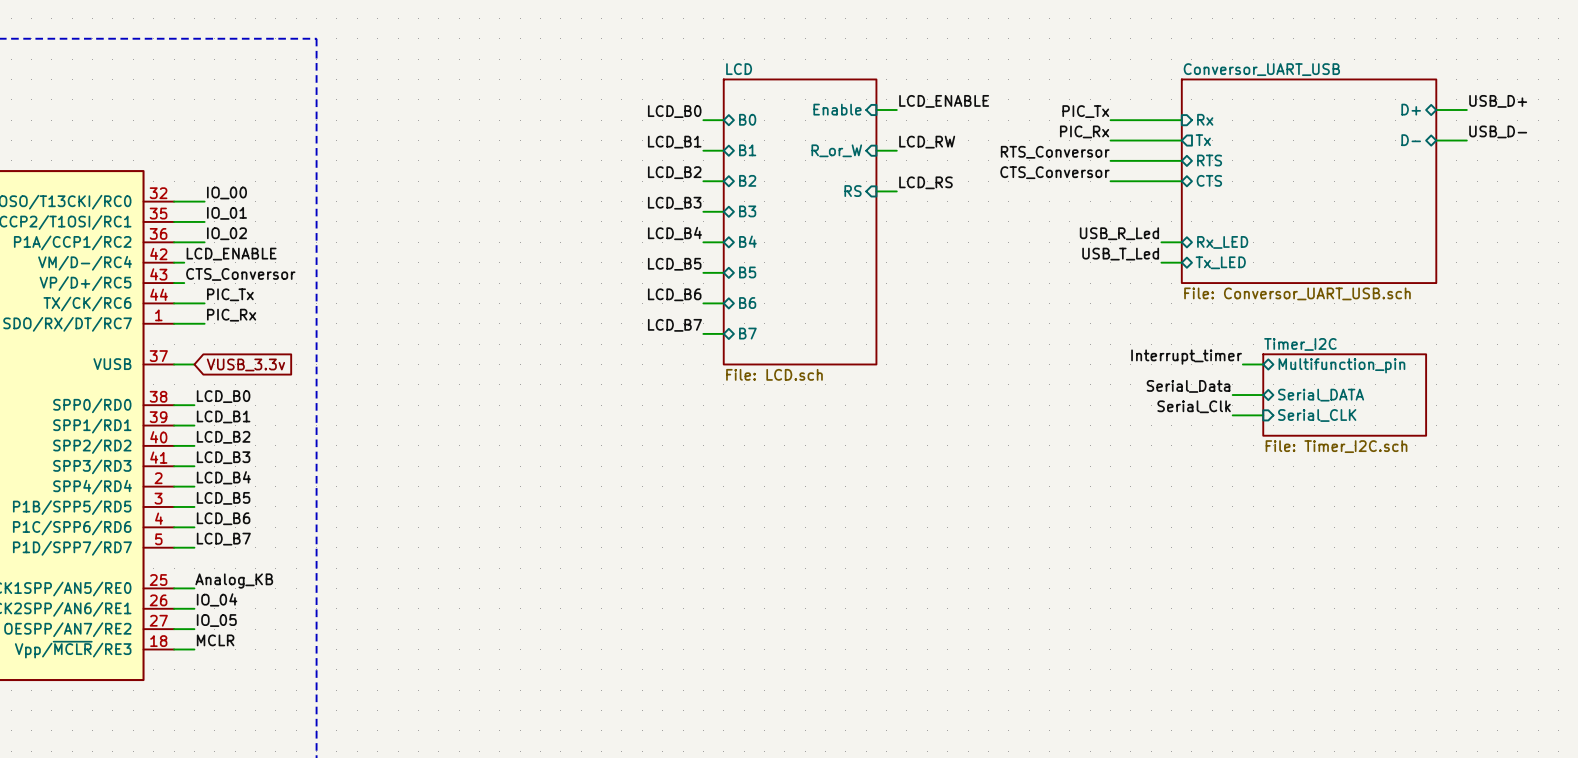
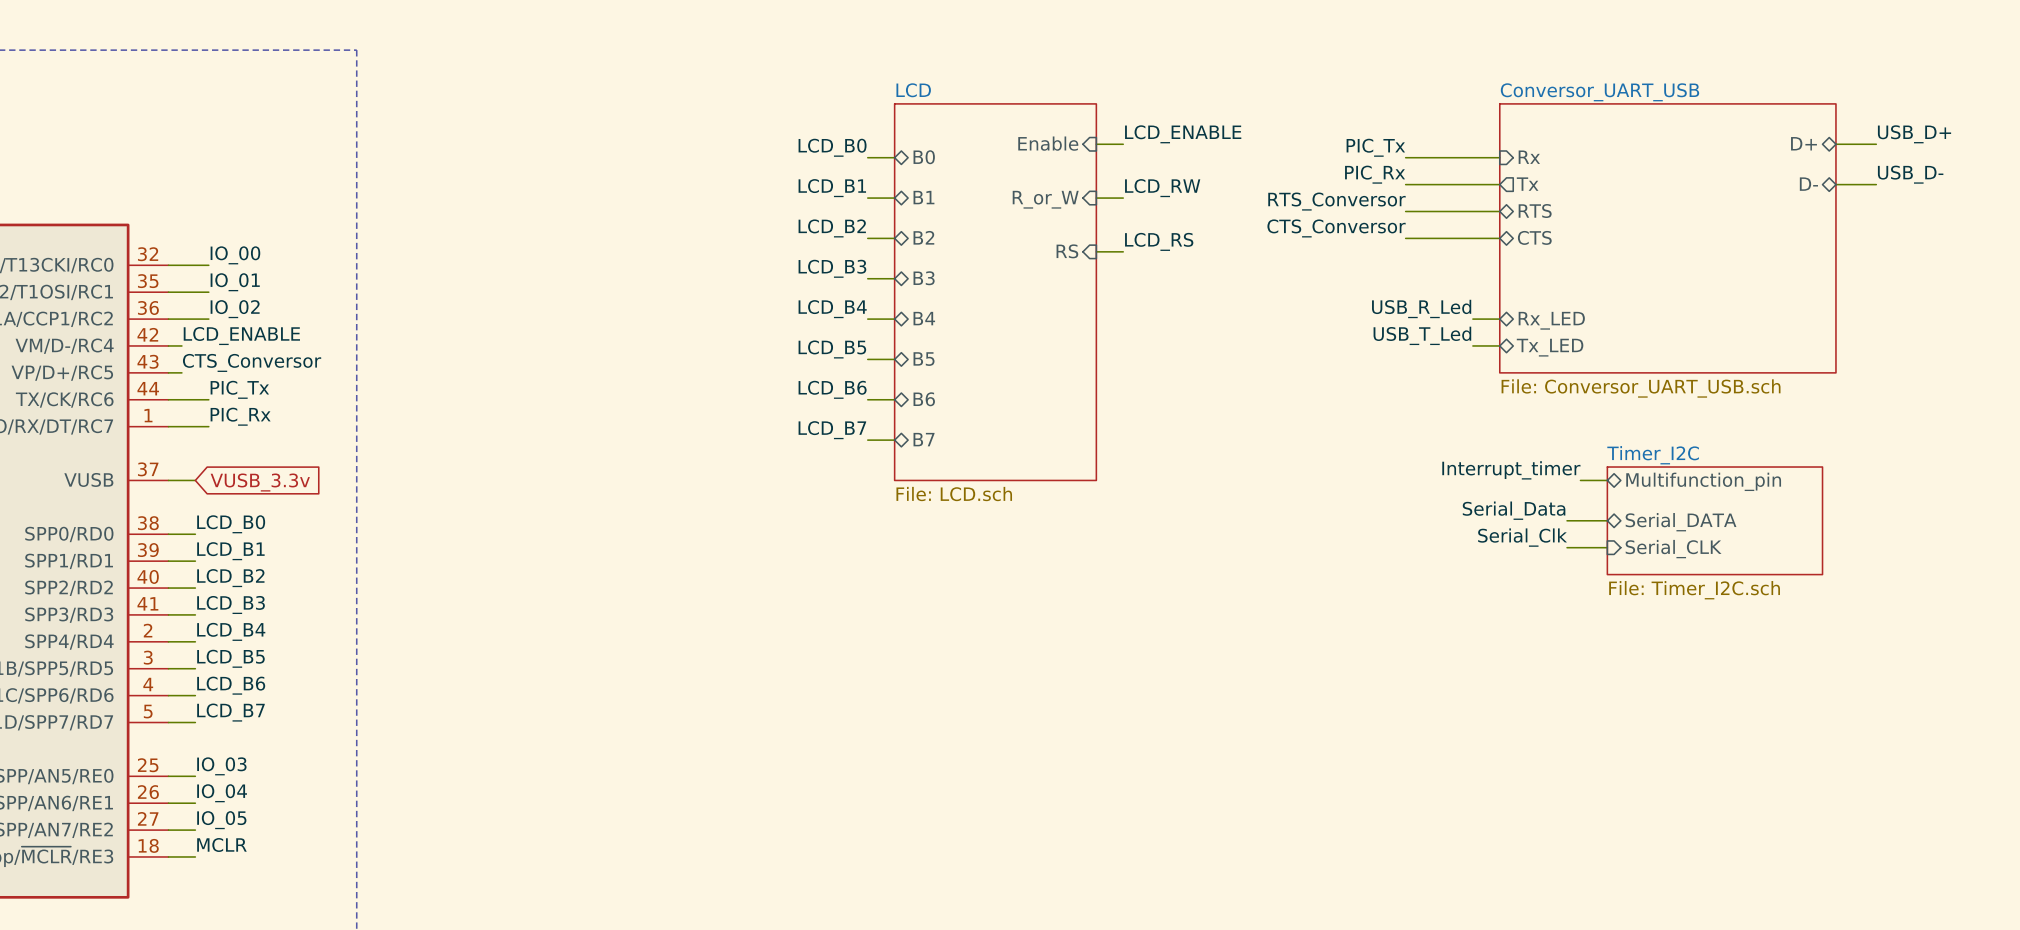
label: Analog_KB (234, 581) -> IO_03 (221, 766)

